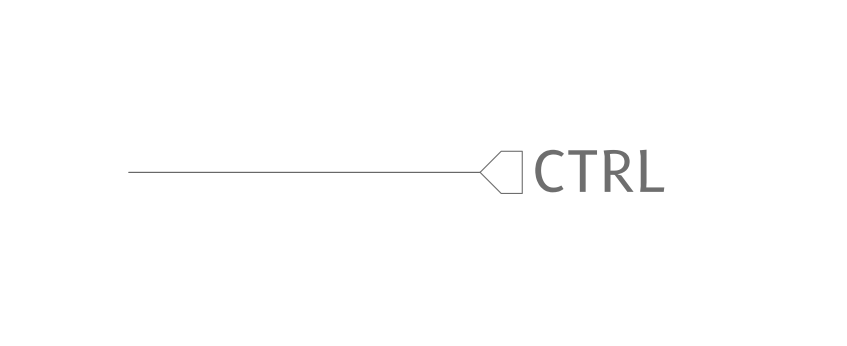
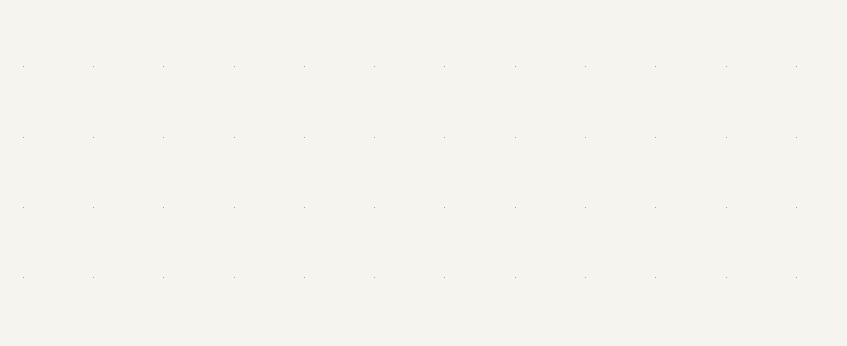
hierarchical label: CTRL (599, 171) -> none
bus: (128, 172) (480, 172) -> none

